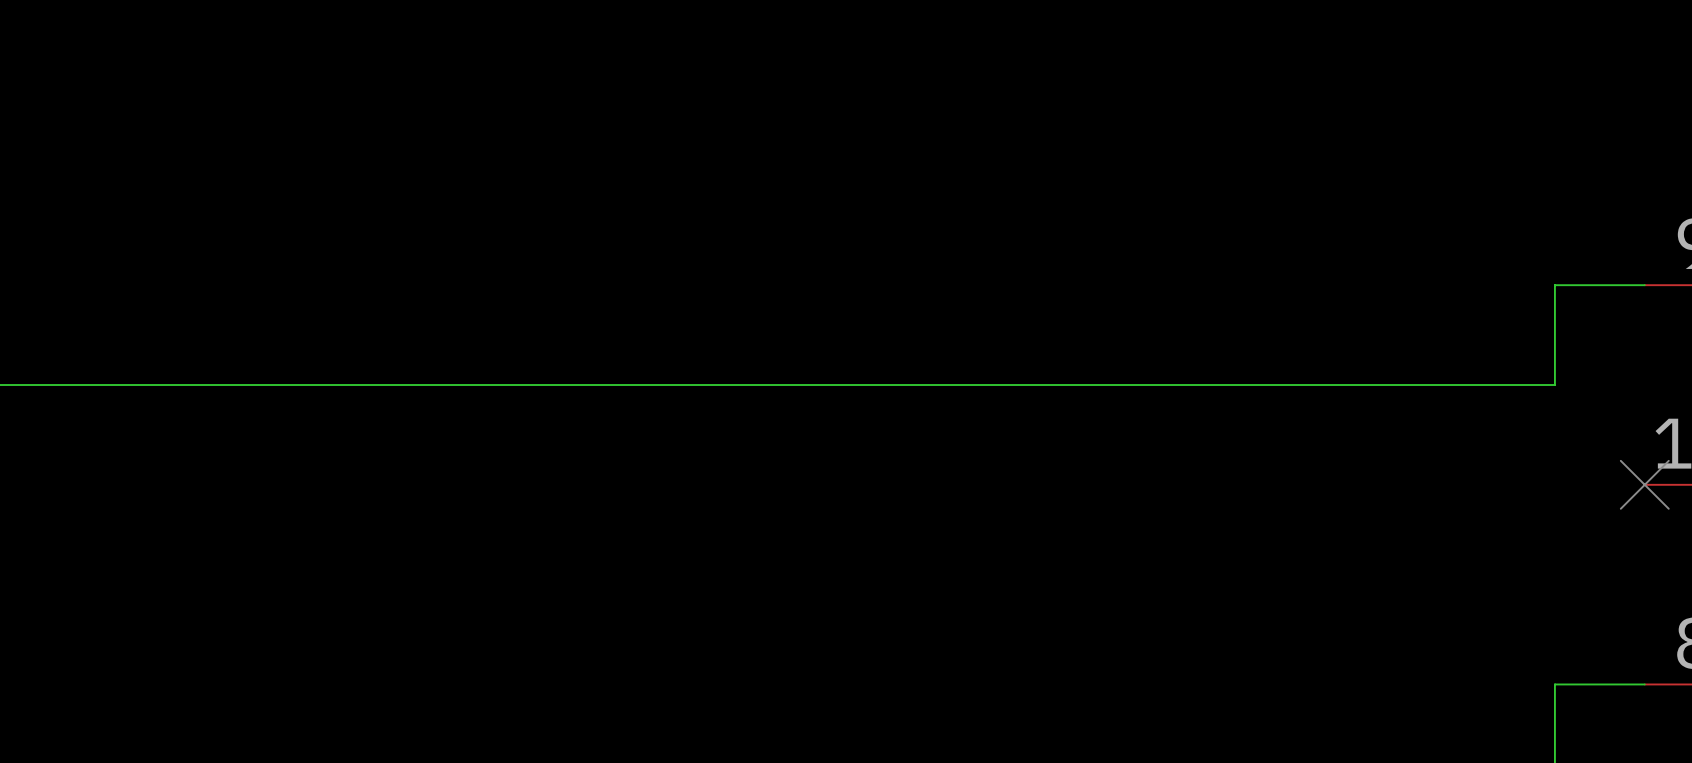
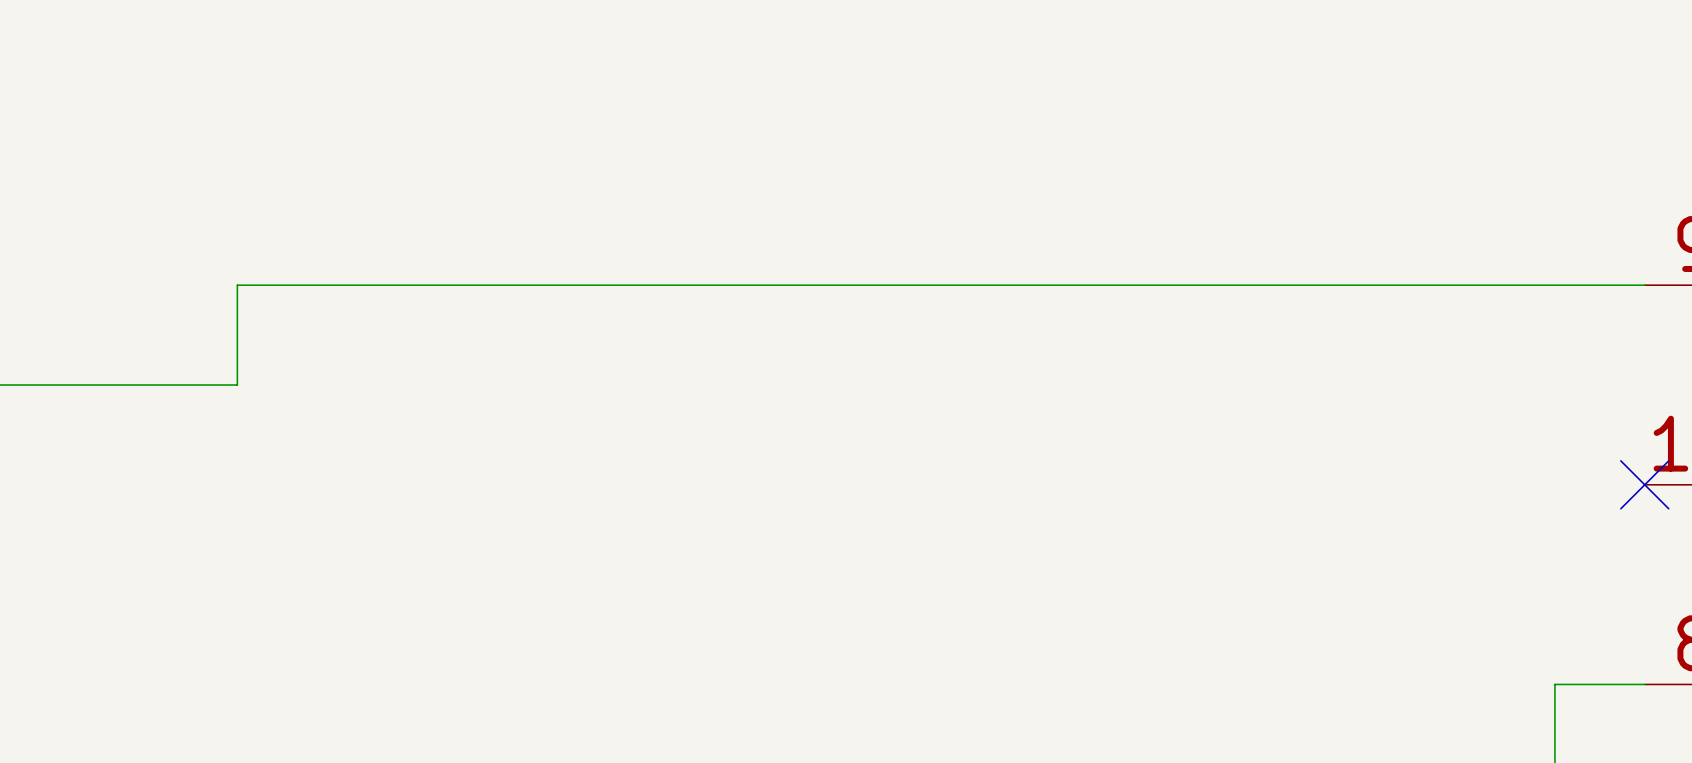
wire: (1554, 285) (1554, 385) (237, 385) -> (1554, 285) (237, 285) (237, 385)

